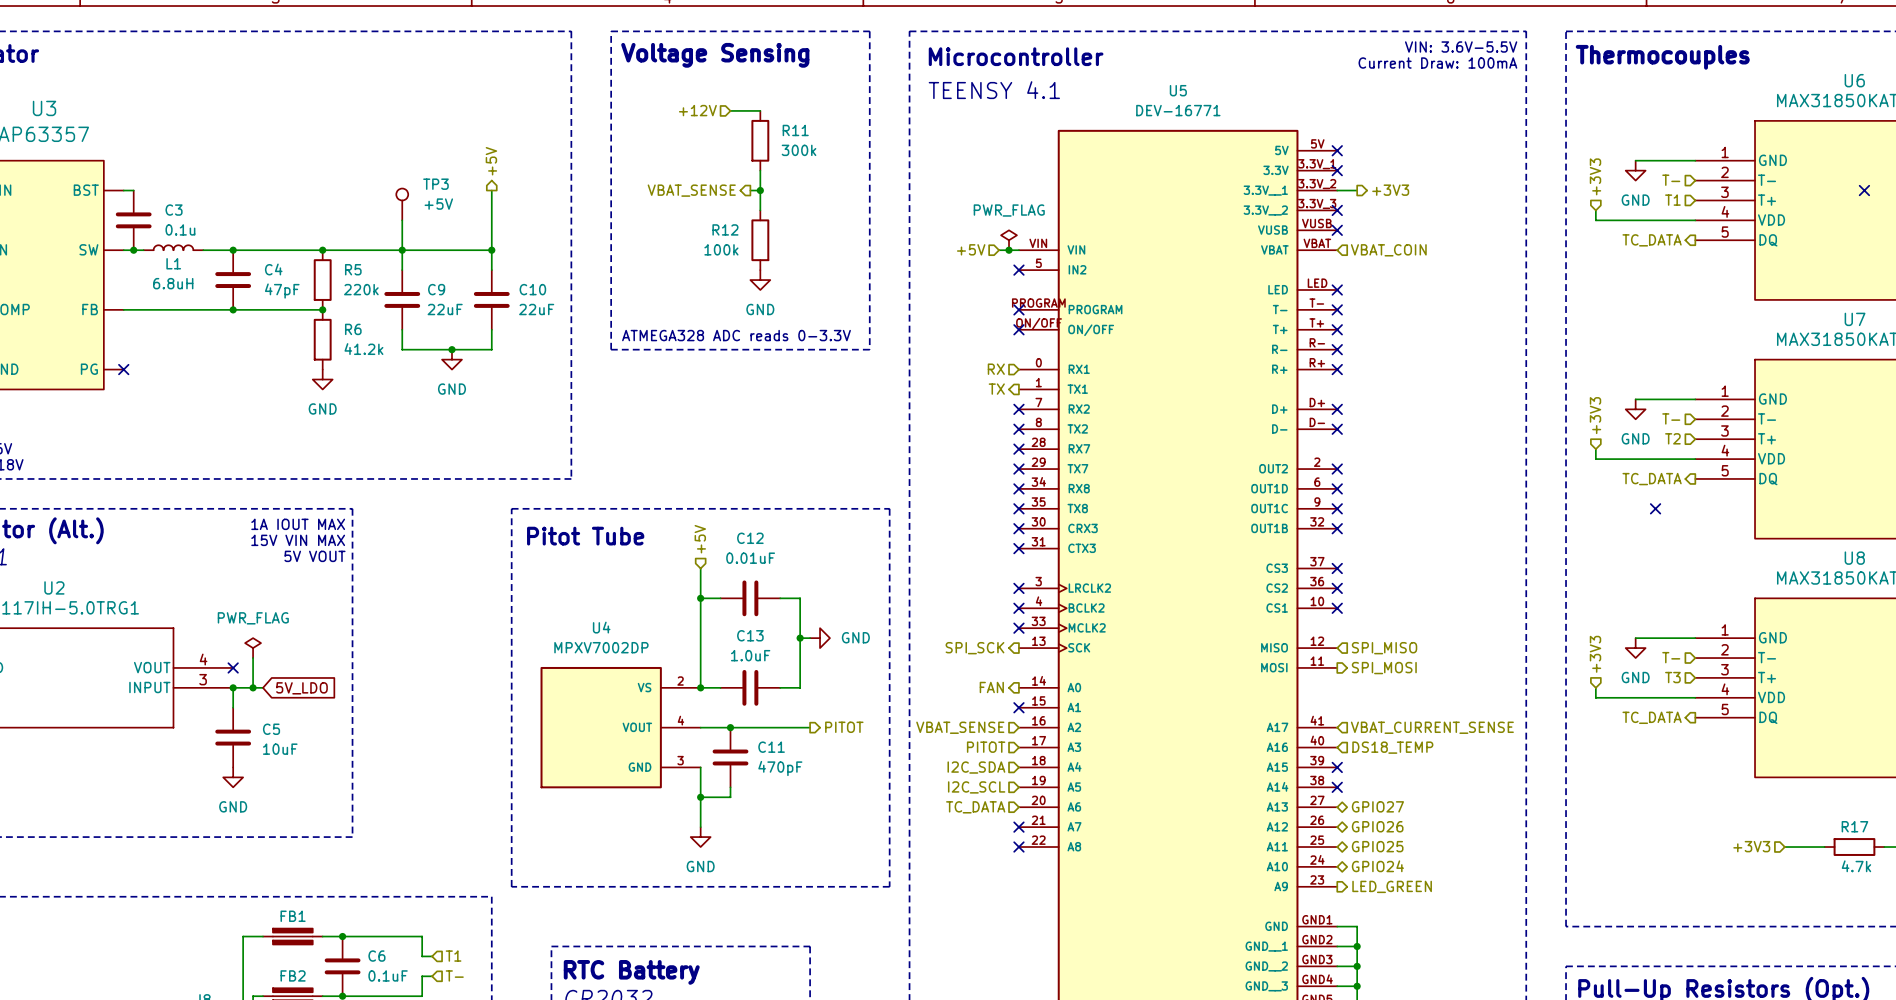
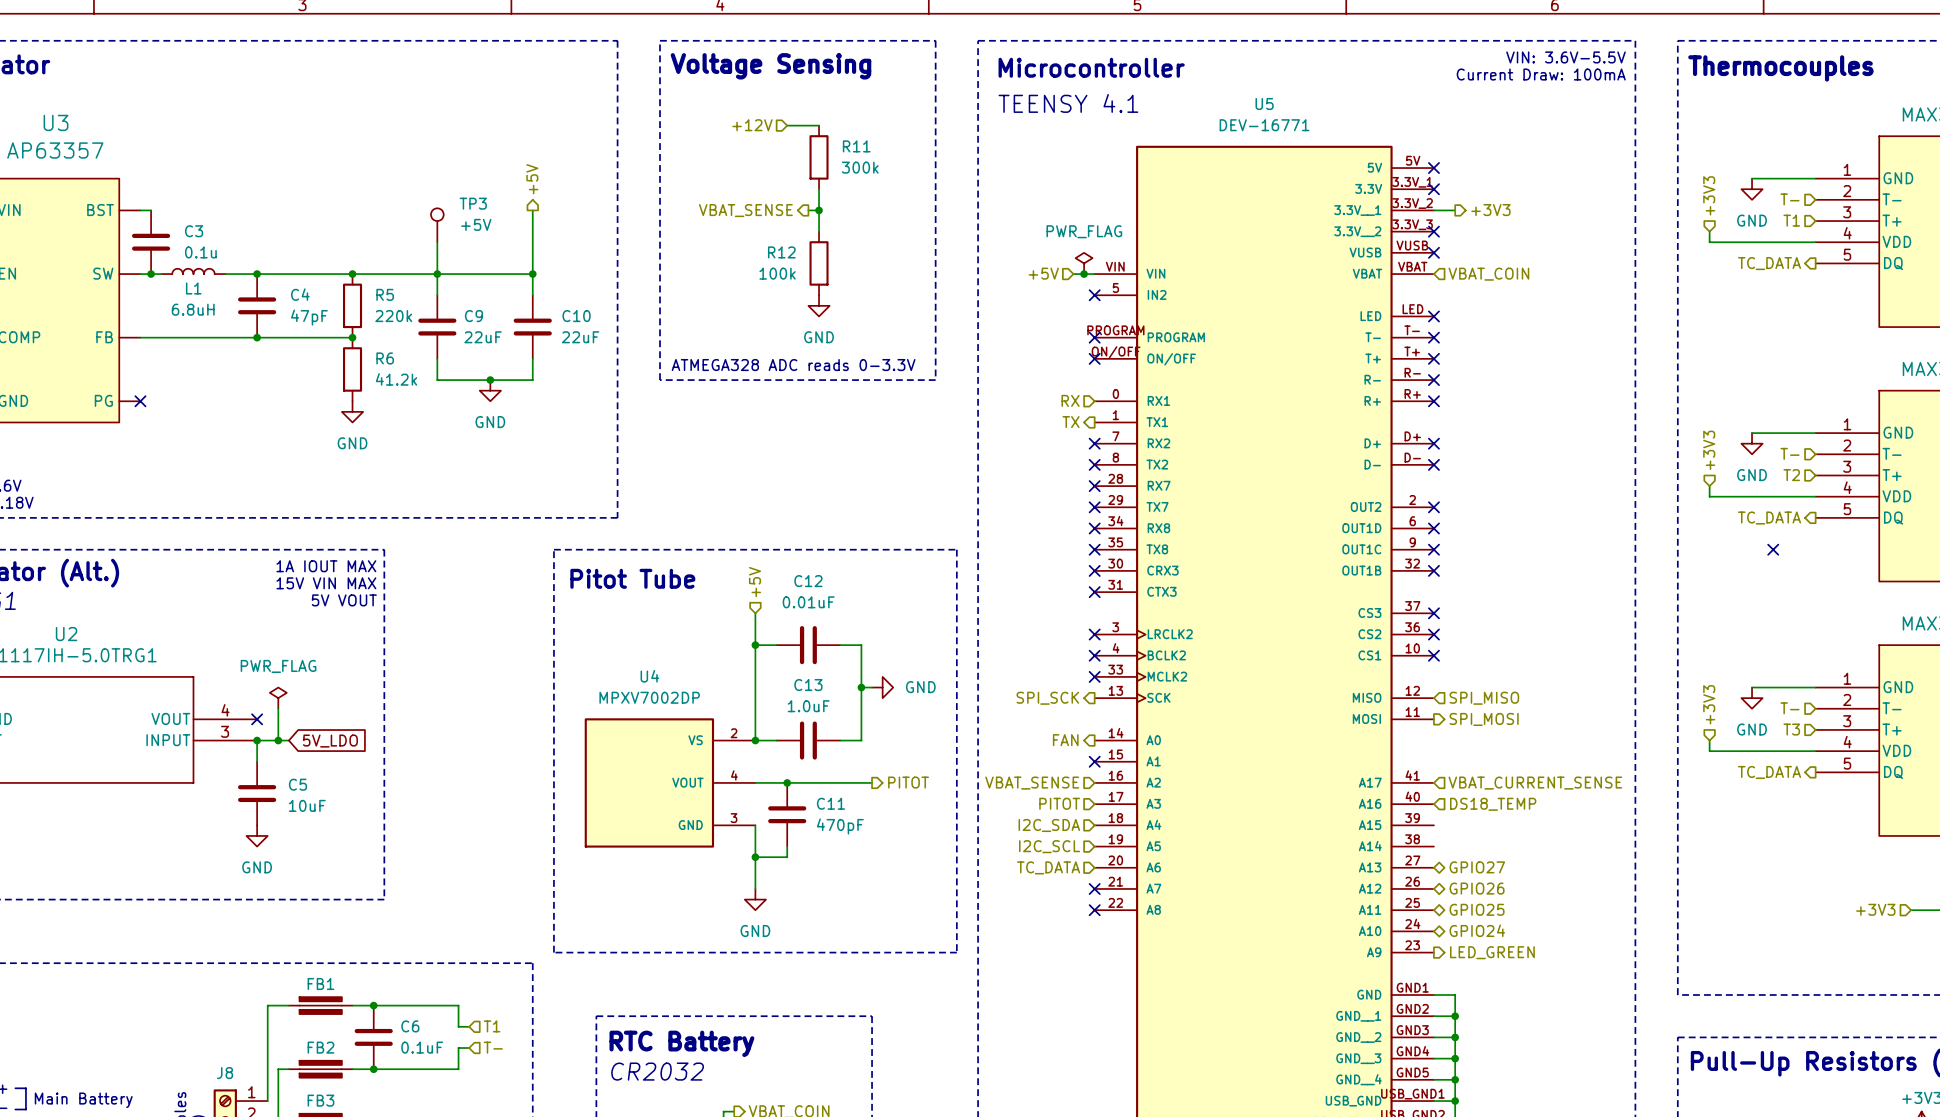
no-connect mark: (1337, 767) -> none
no-connect mark: (1337, 787) -> none

